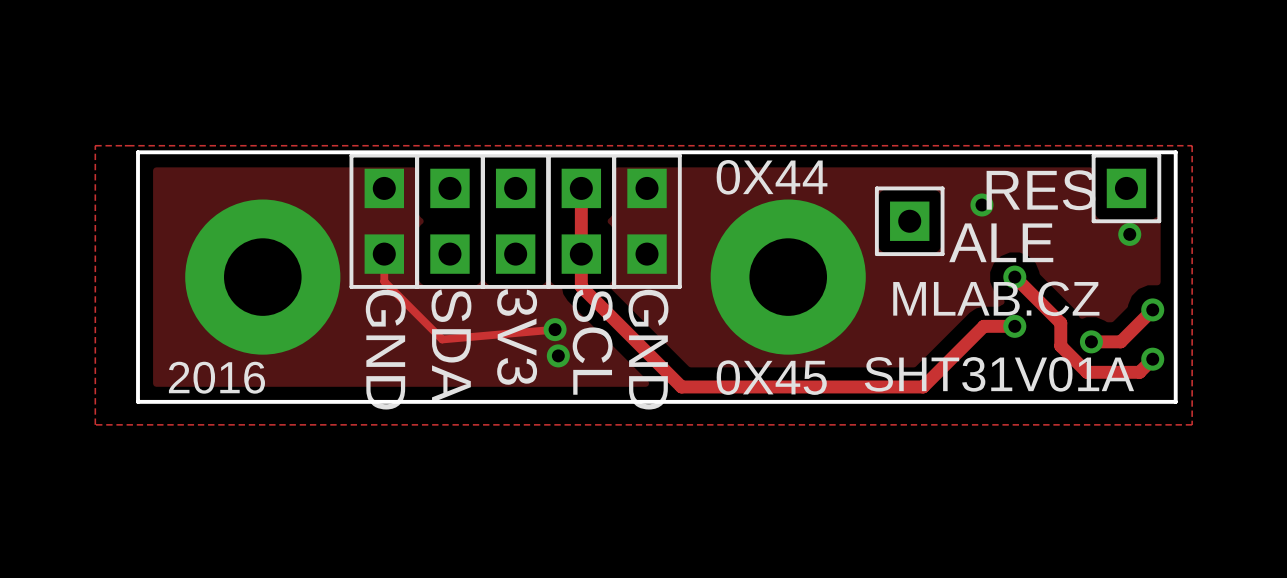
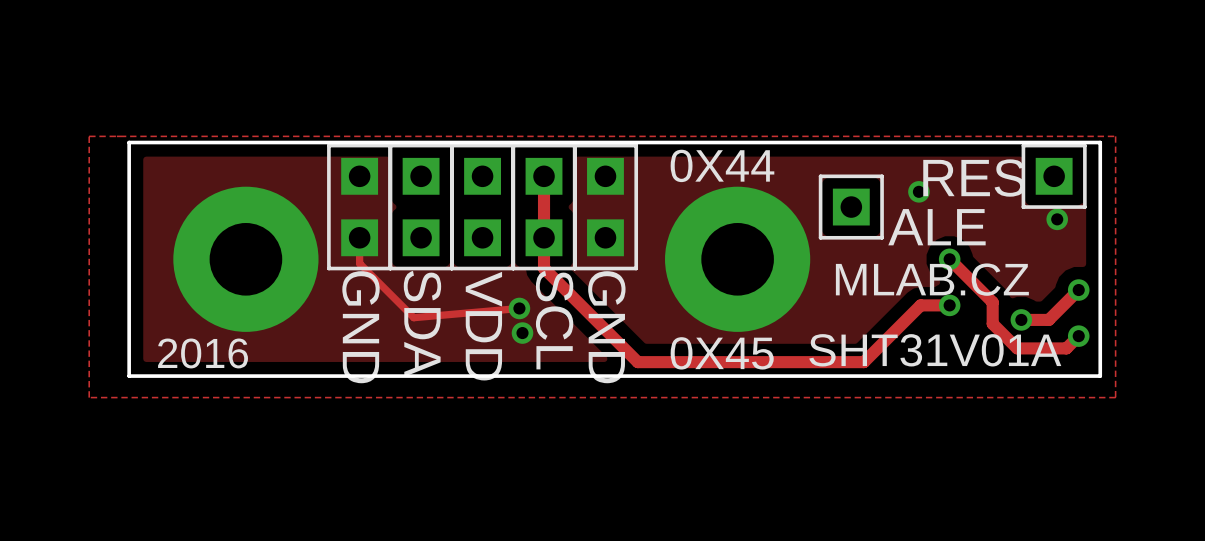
text: 3V3 (517, 336) -> VDD (483, 326)

